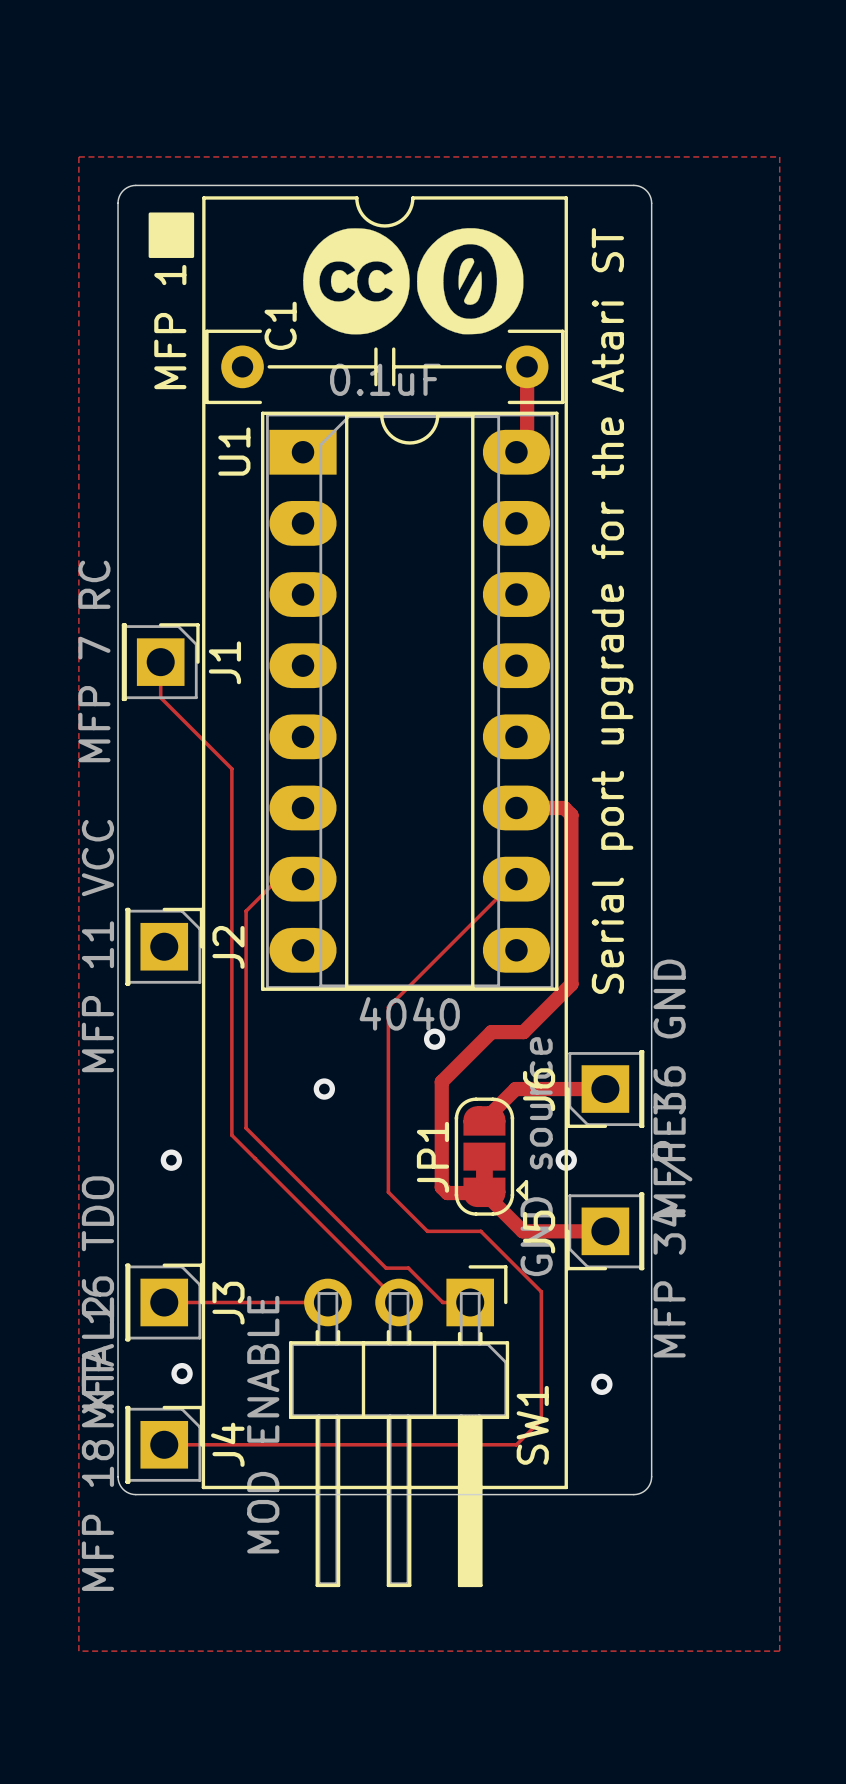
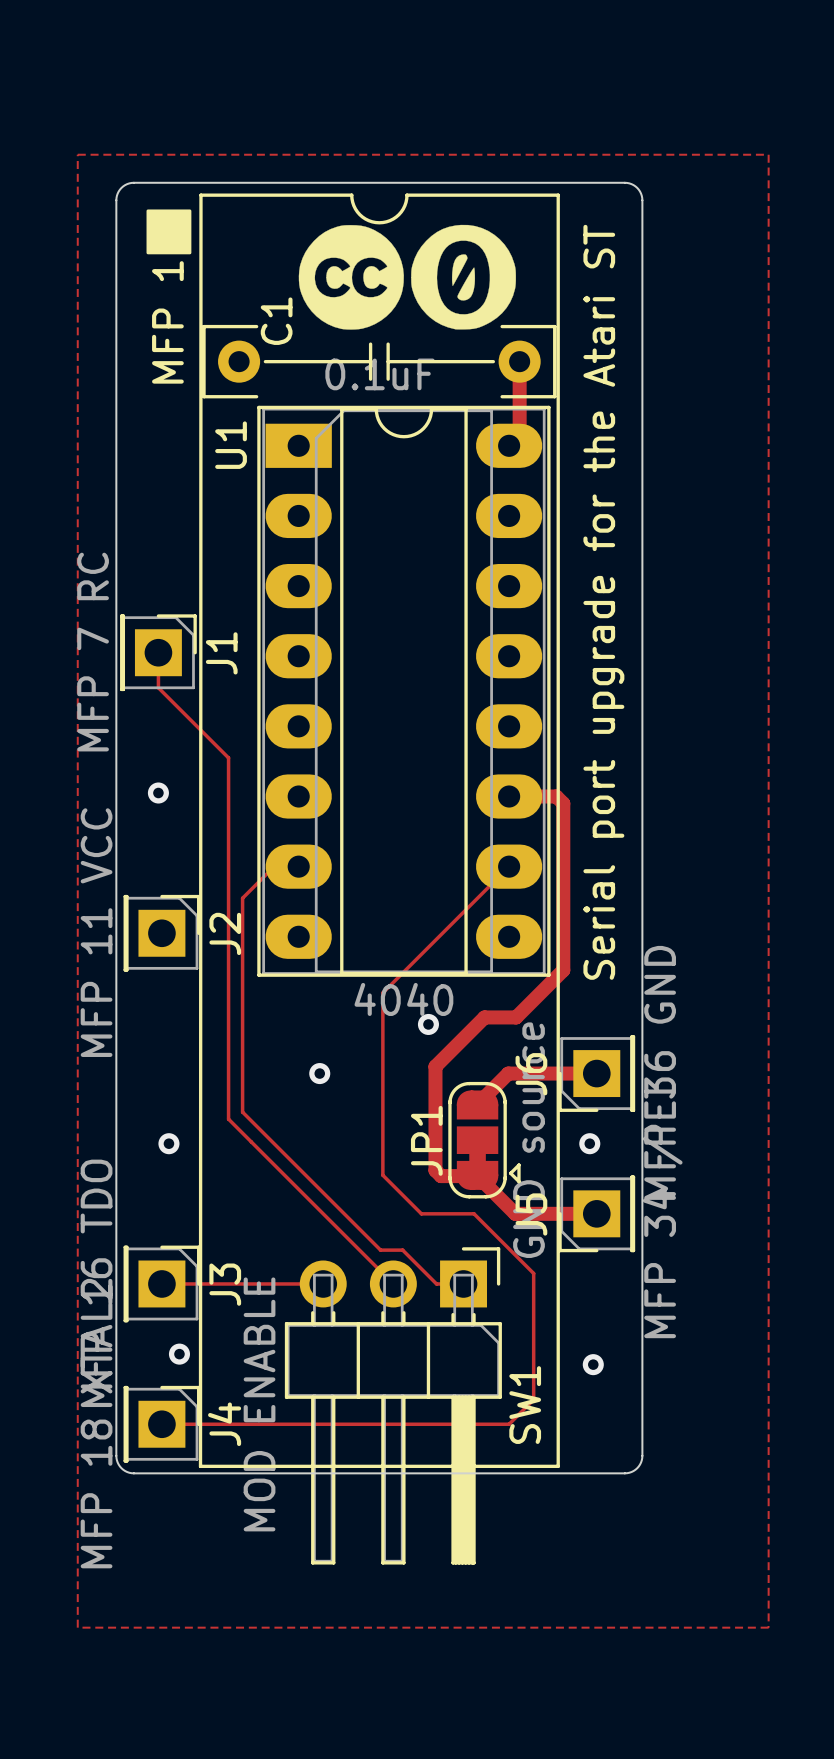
via: none -> (158, 793)
via position: (566, 1160) -> (589, 1143)

